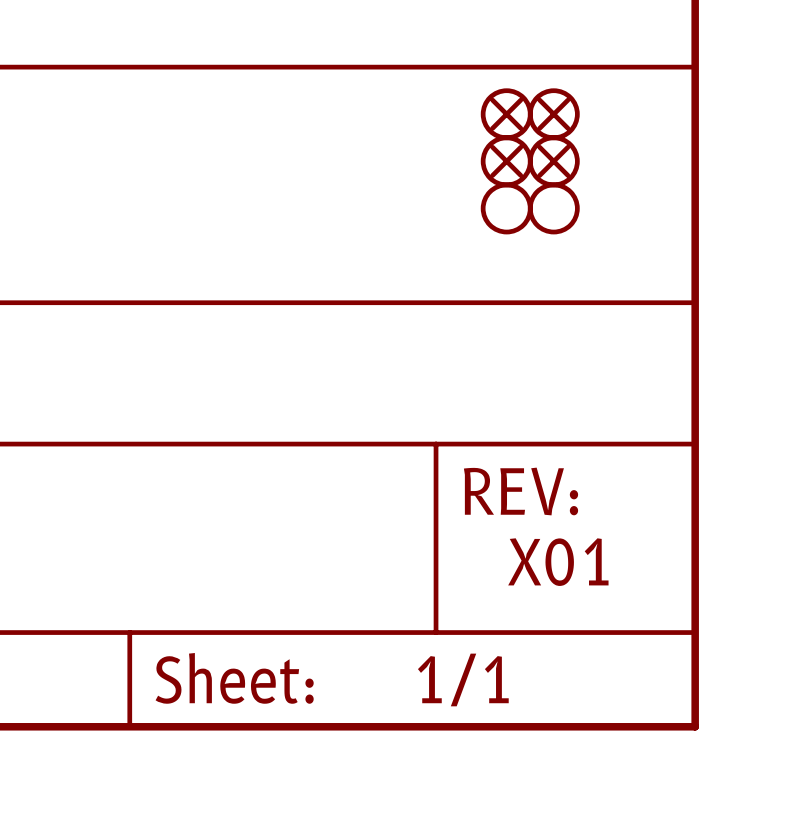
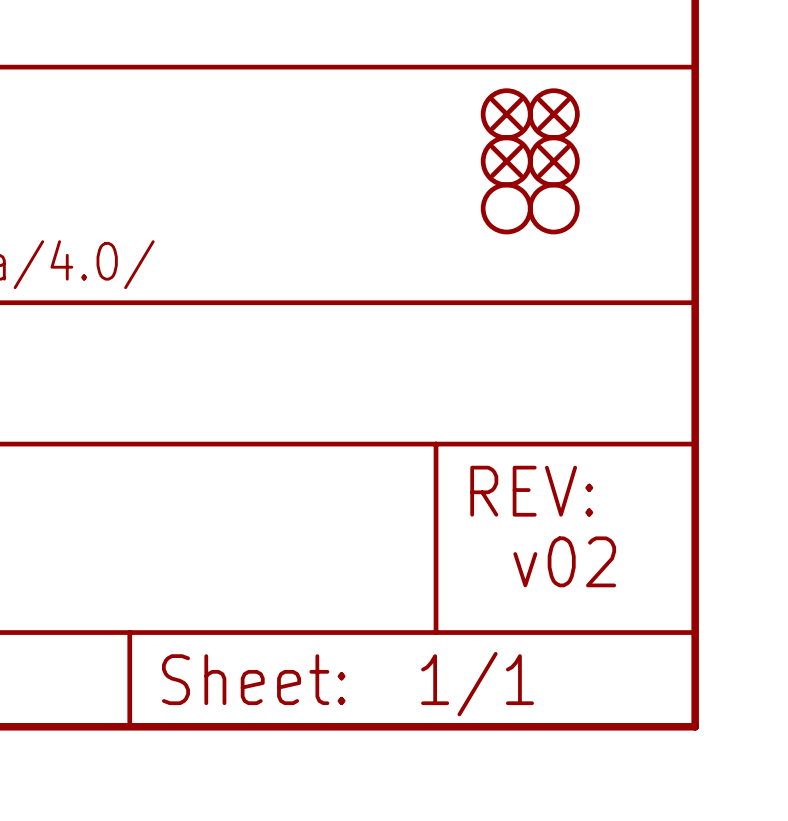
text: X01 (558, 562) -> v02 (564, 561)

